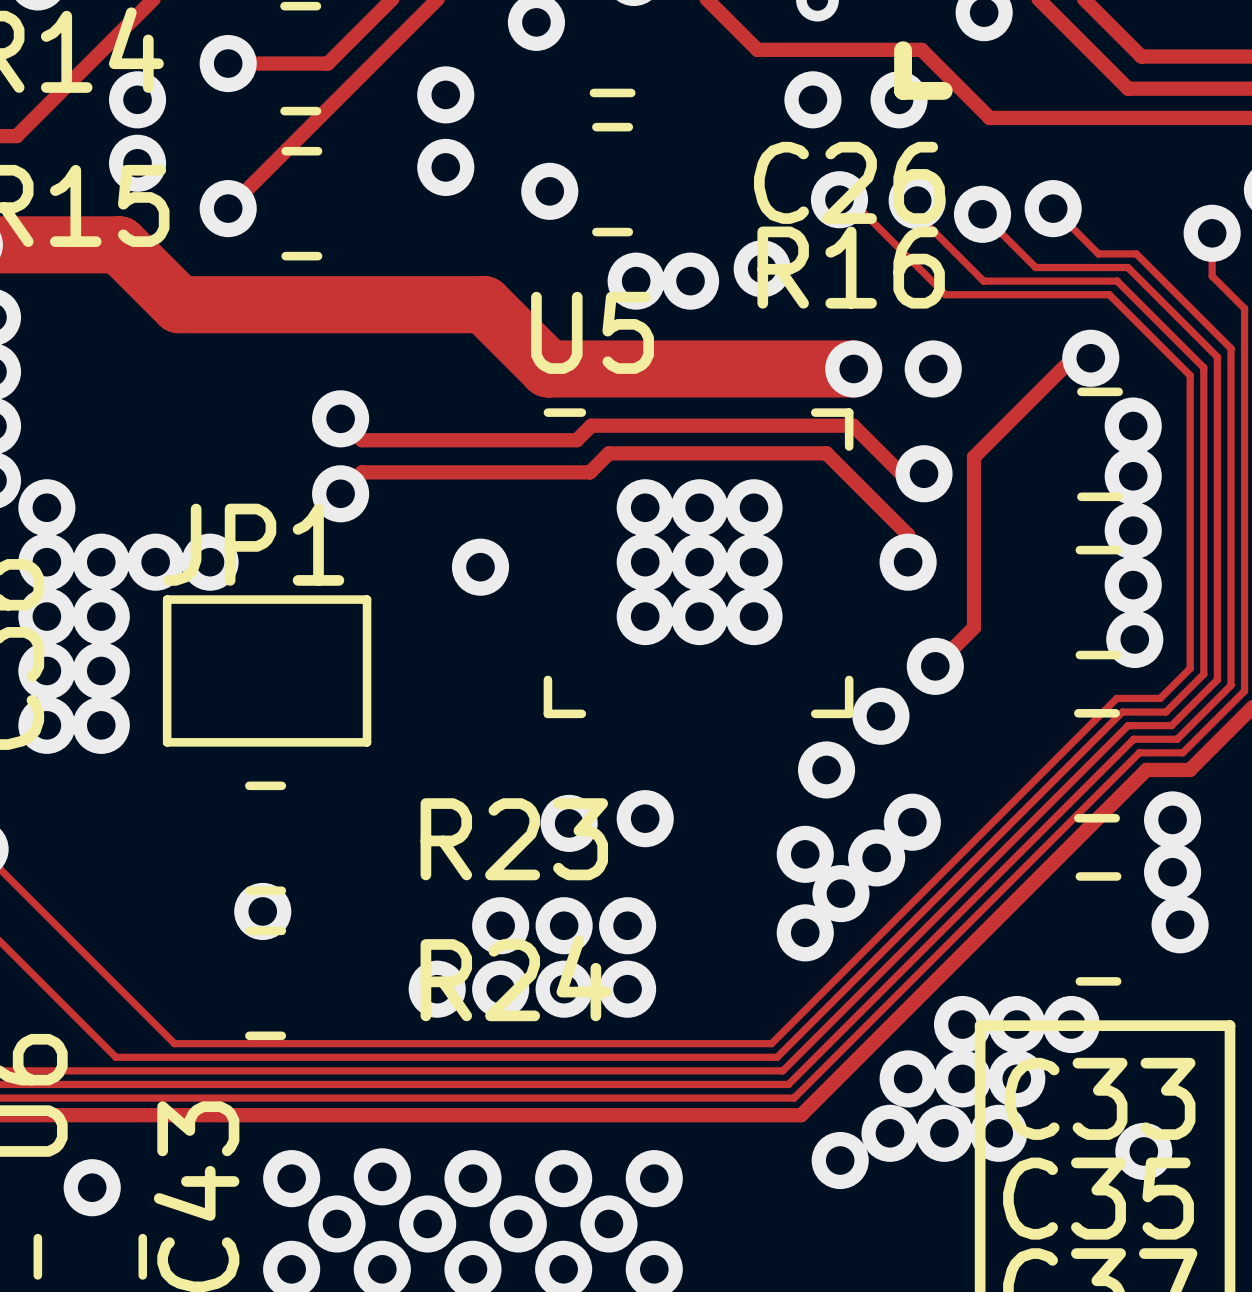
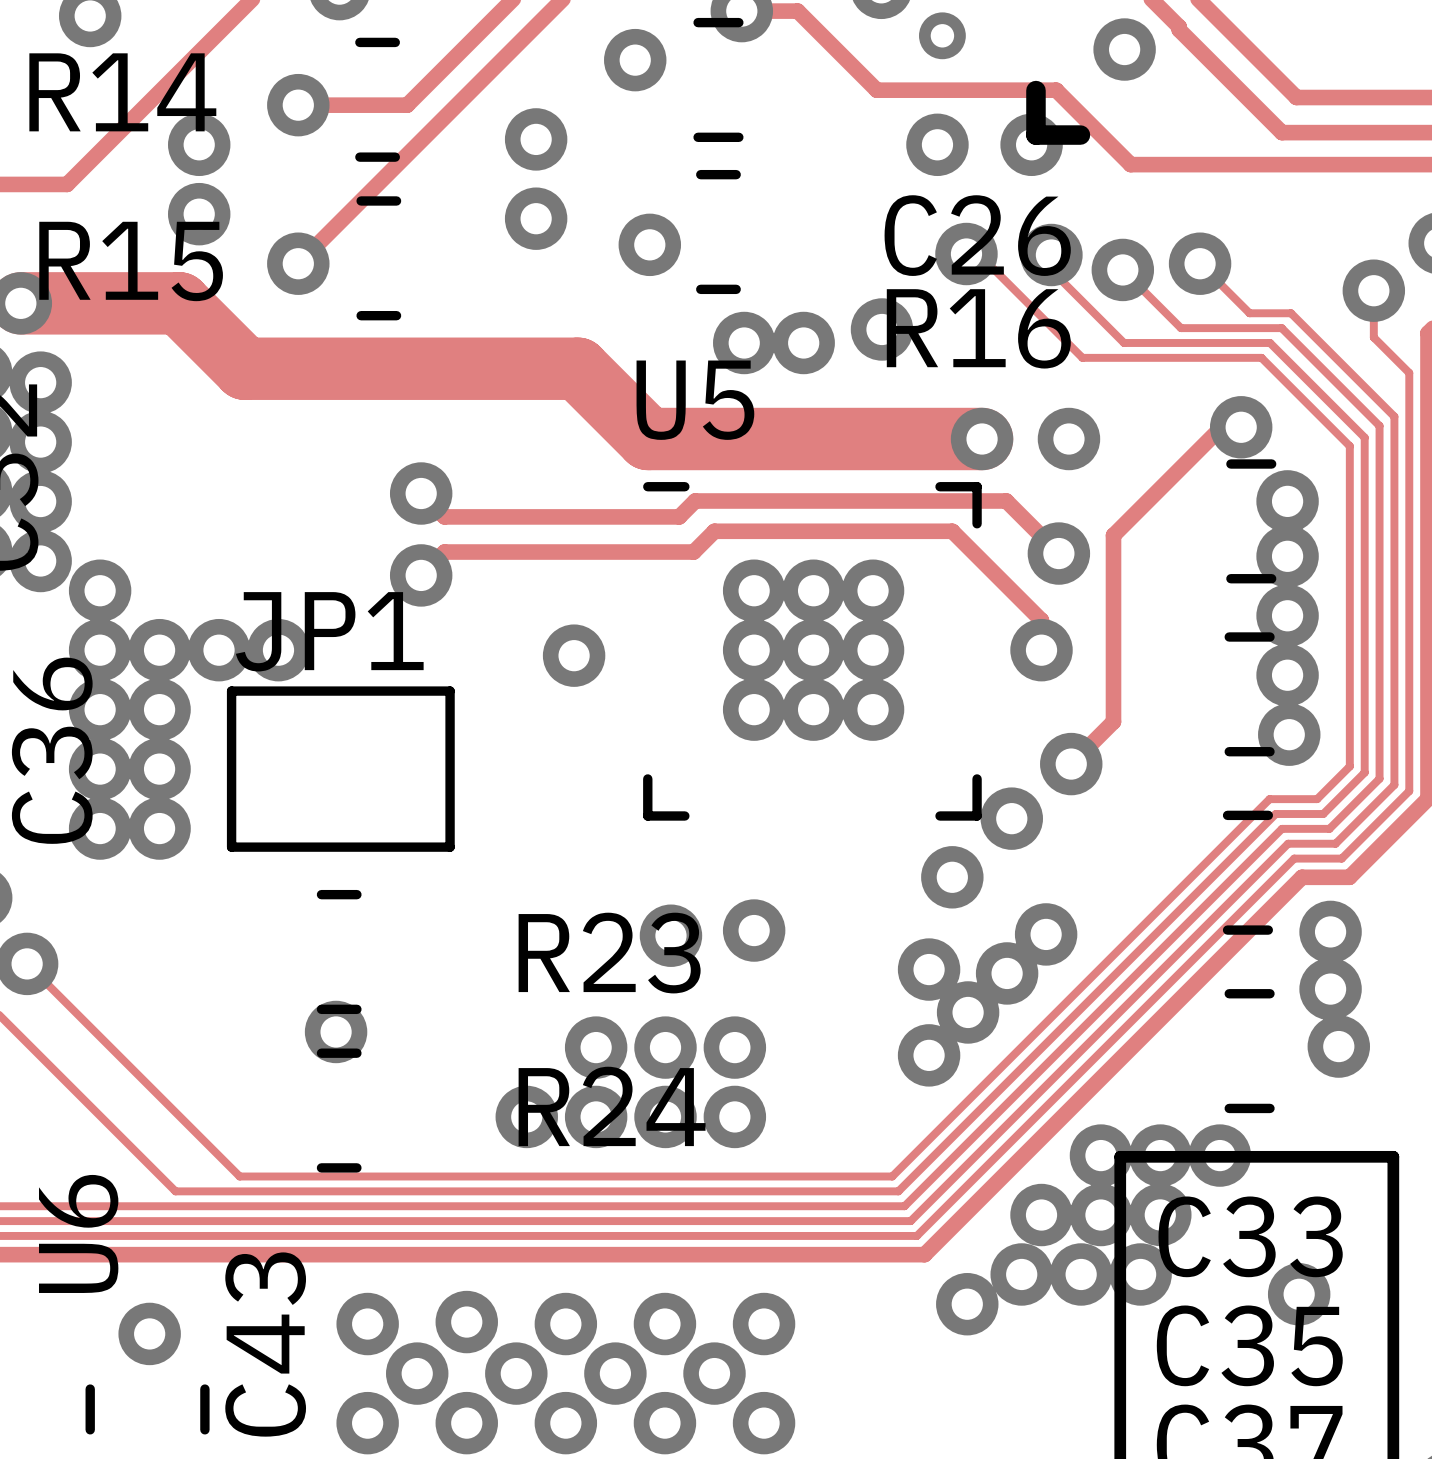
track: (853, 425) (901, 473) (924, 473) (928, 478) -> (981, 501) (1006, 501) (1058, 553)

